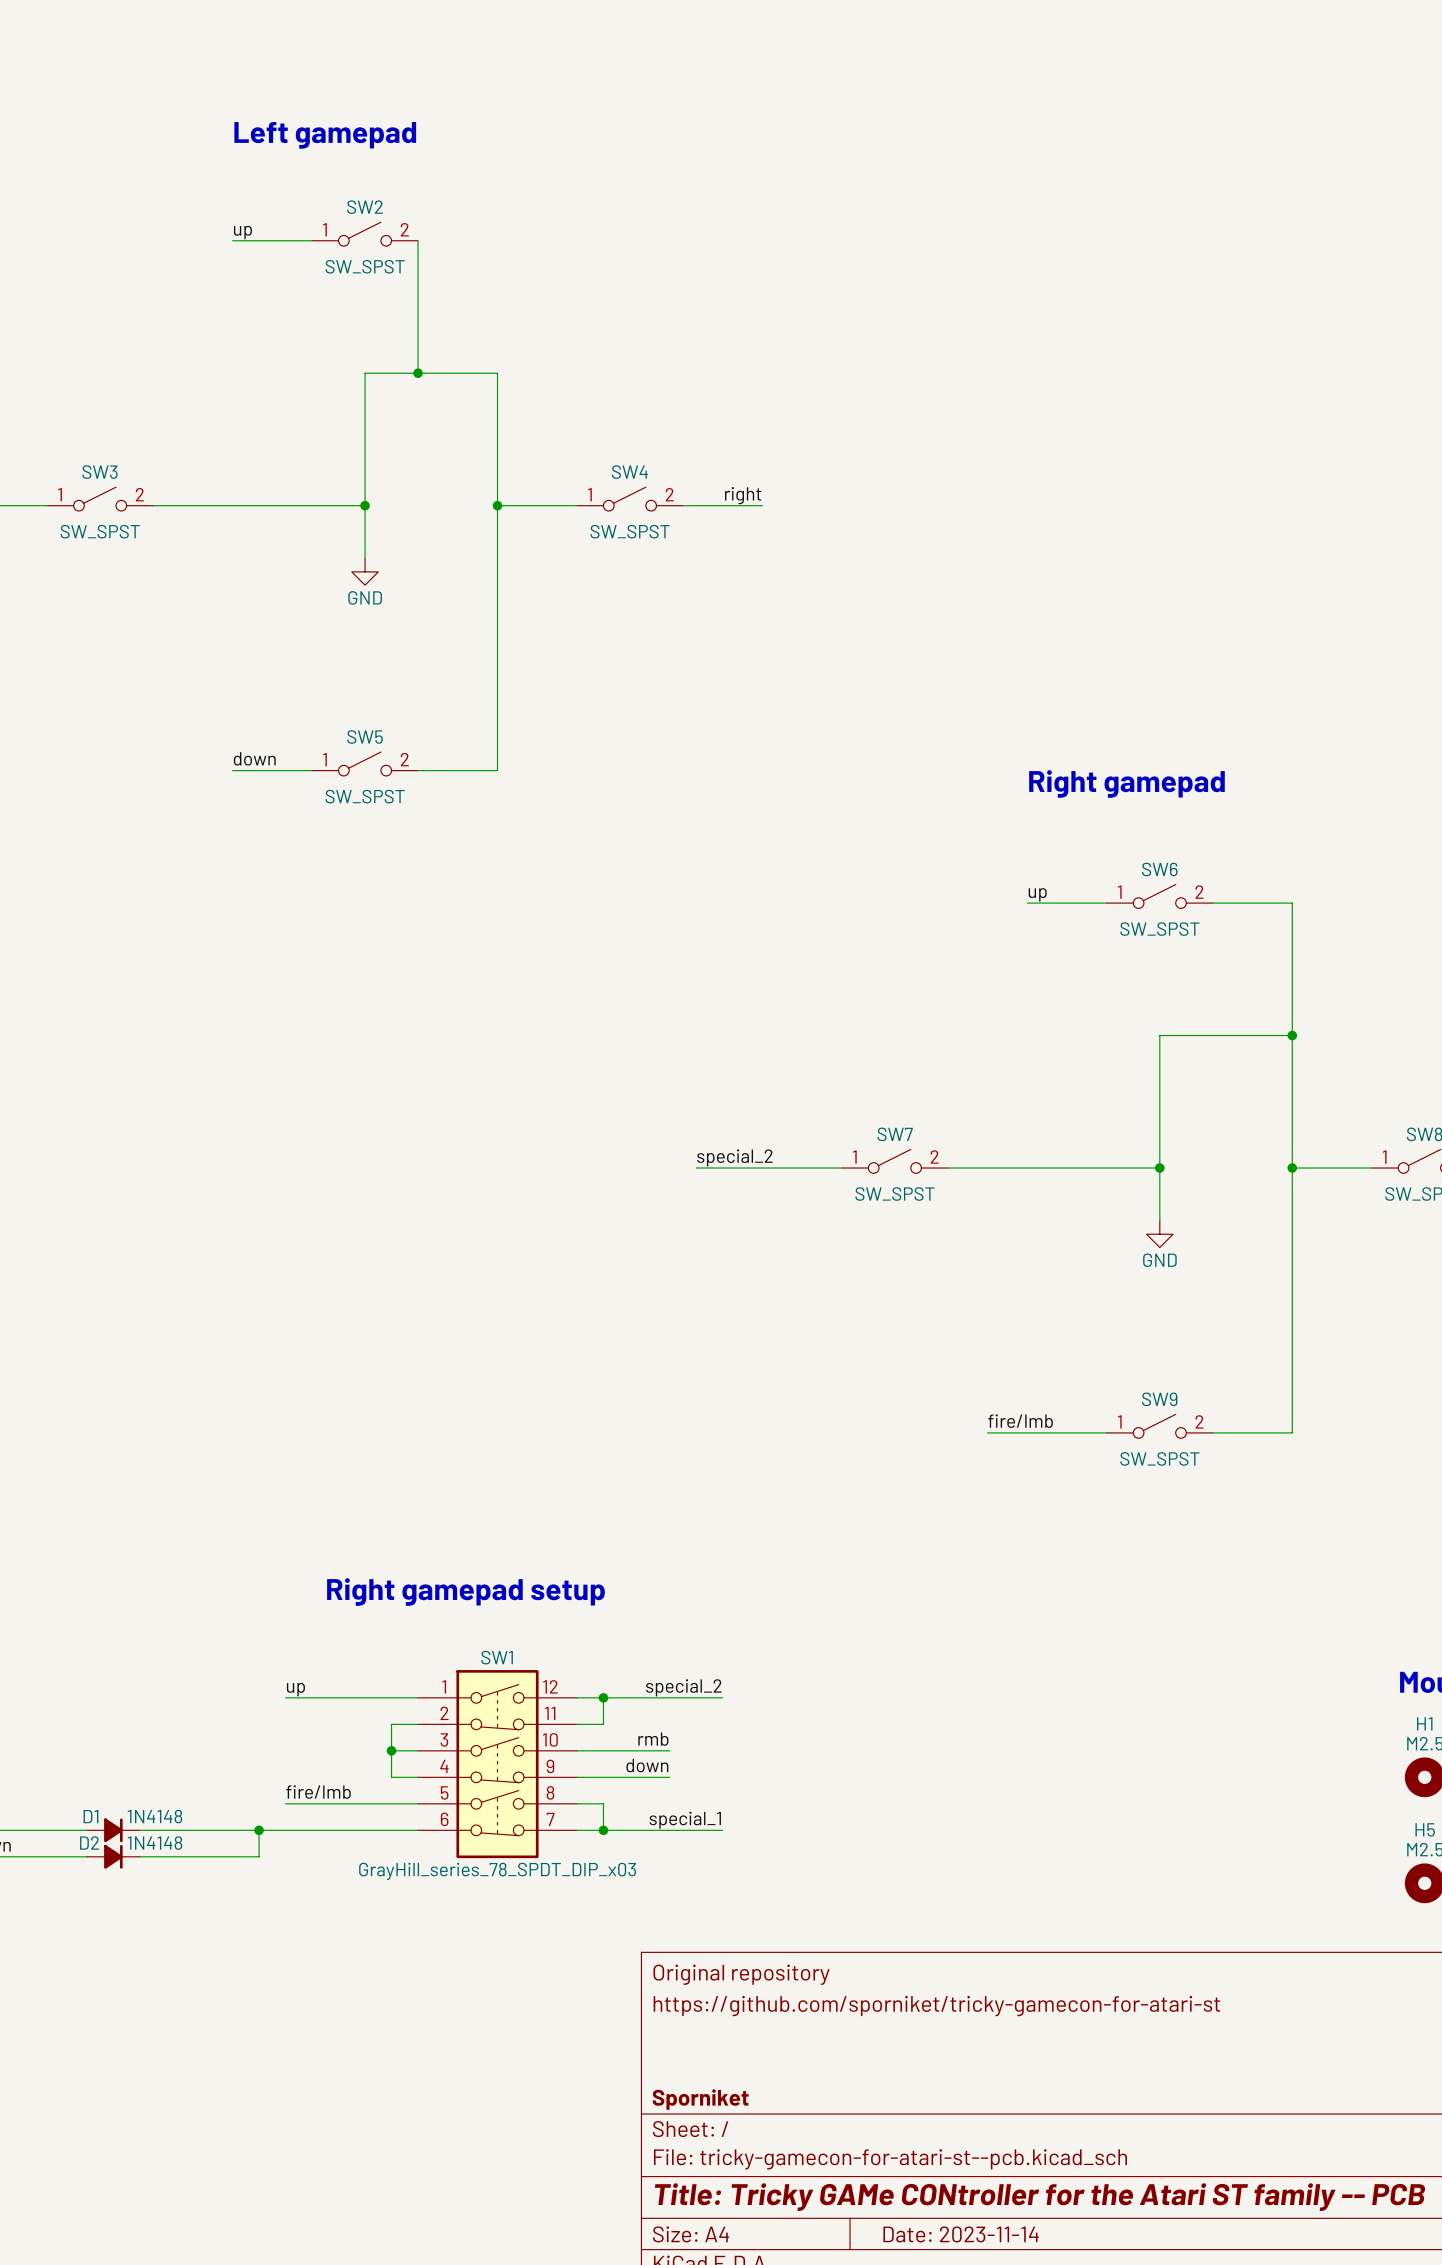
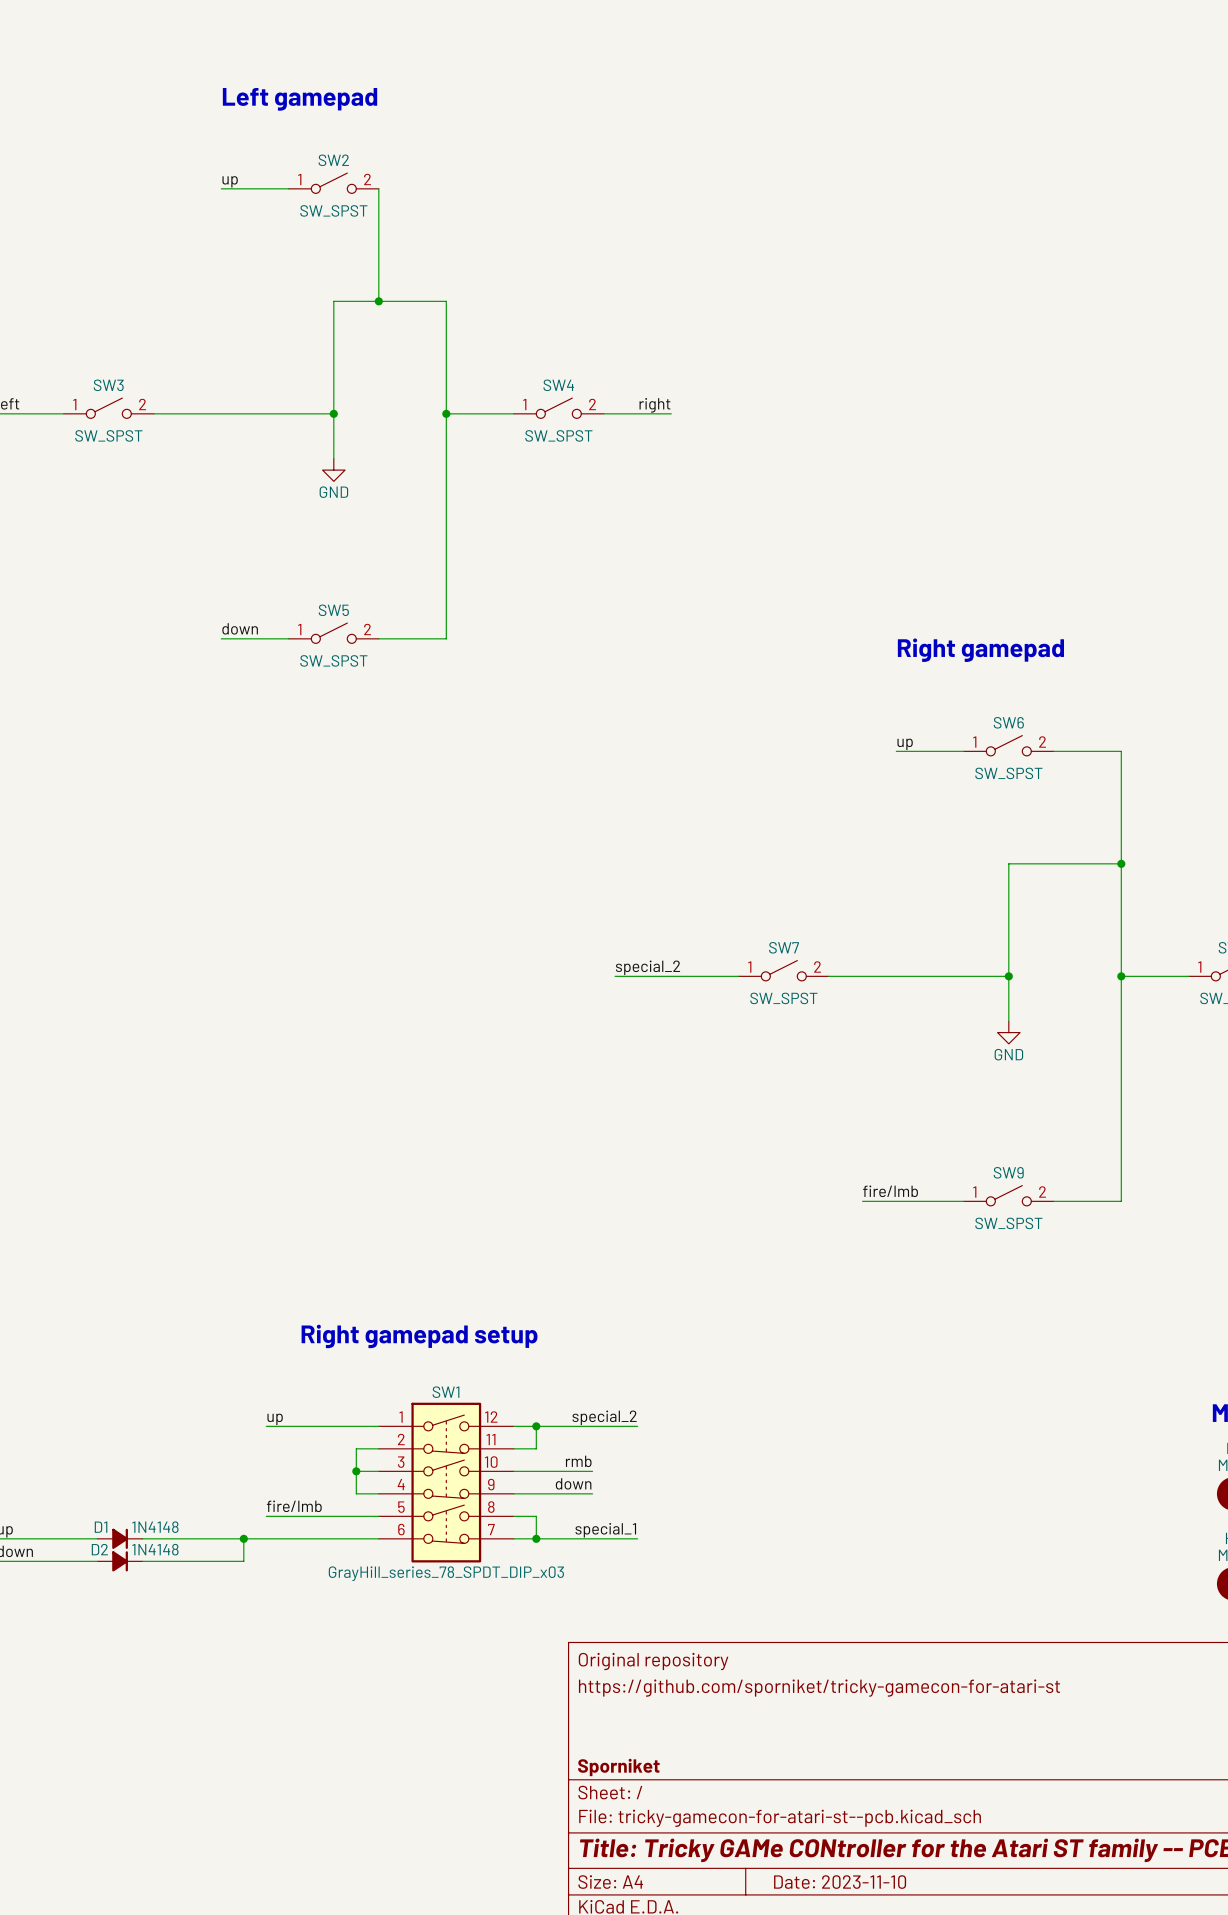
title block: Date: 2023-11-14 (961, 2234) -> Date: 2023-11-10 (840, 1882)

